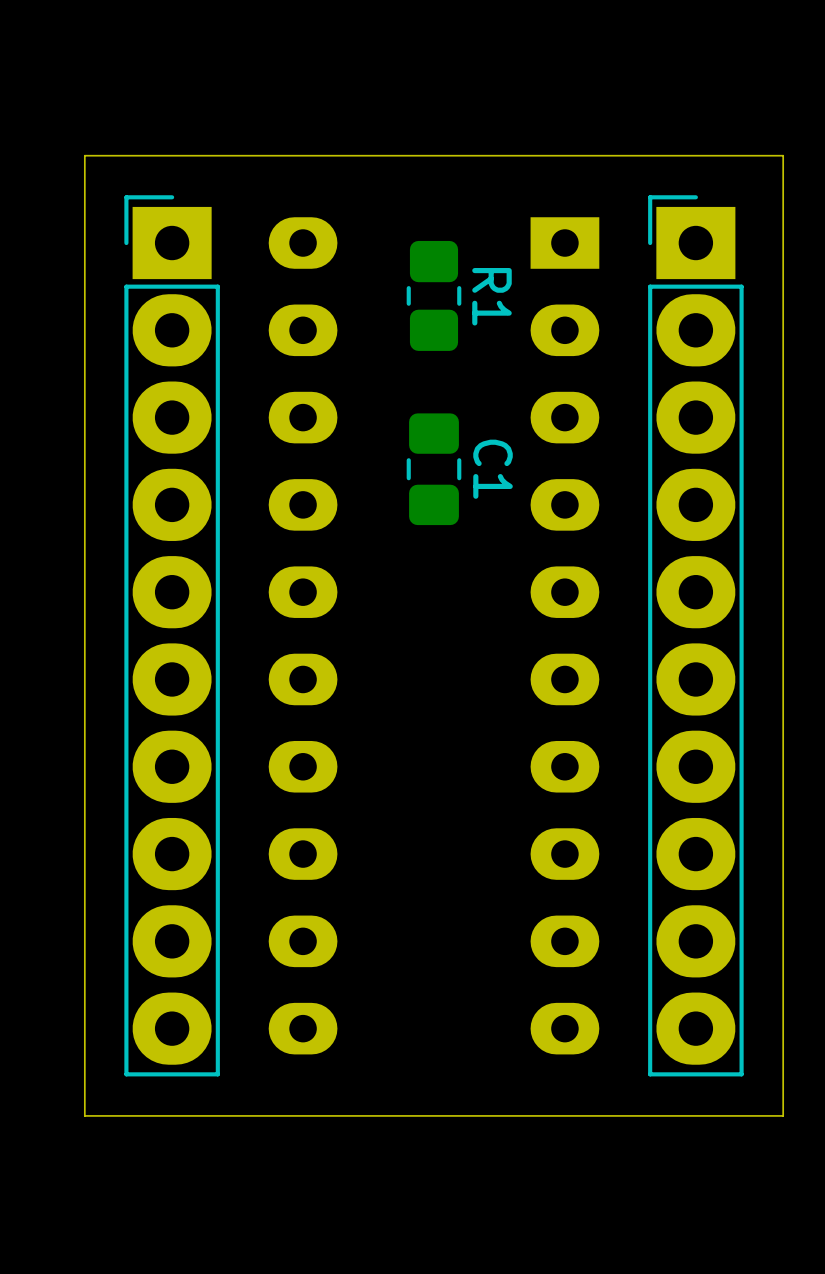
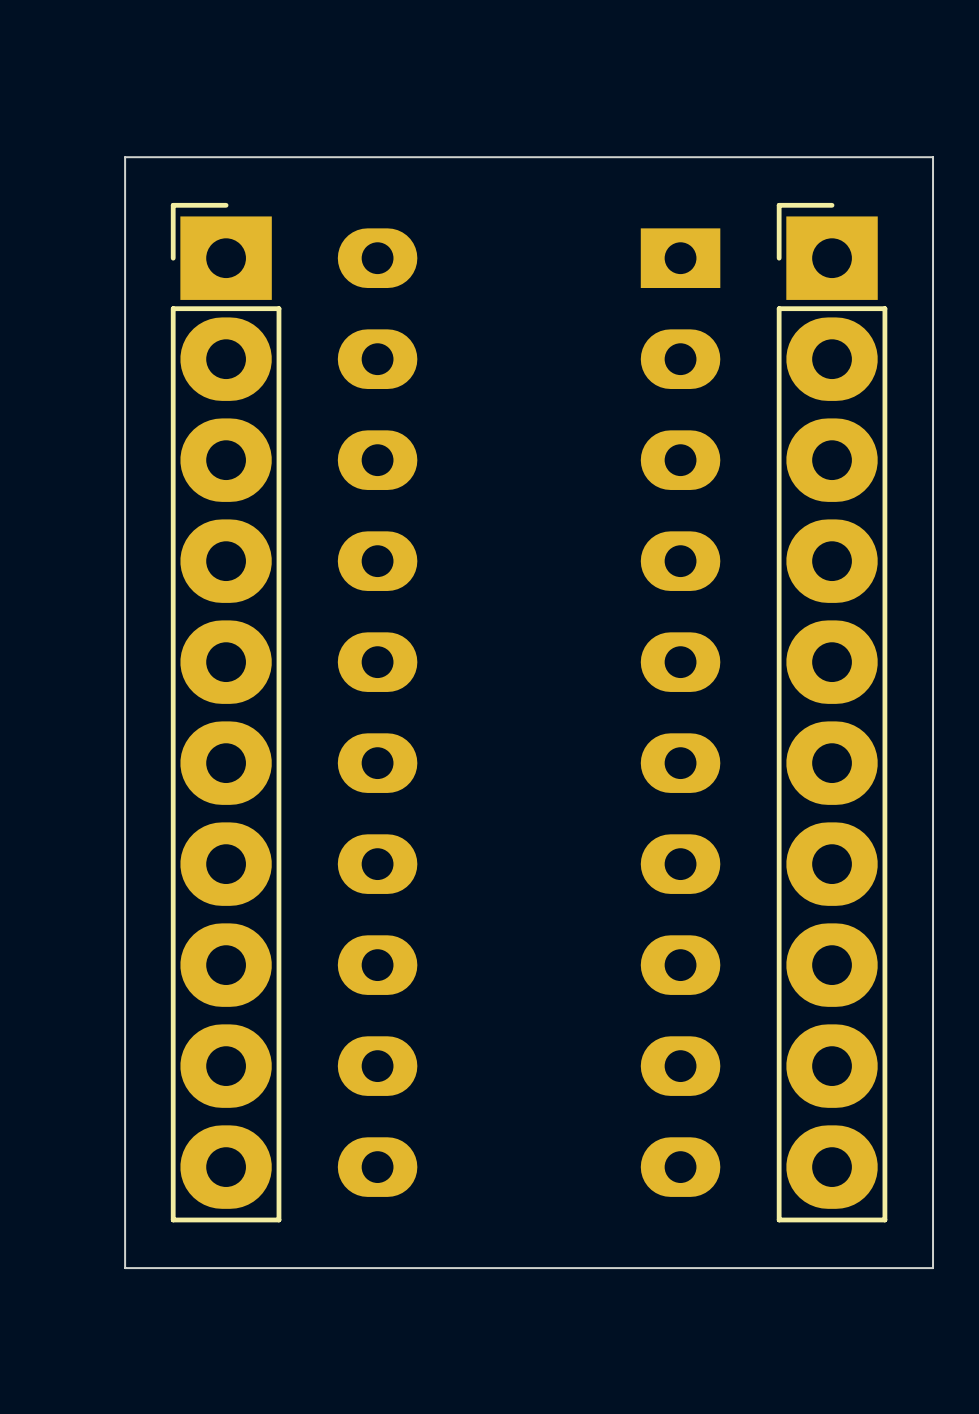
R1: (434, 295) -> none
C1: (434, 469) -> none

